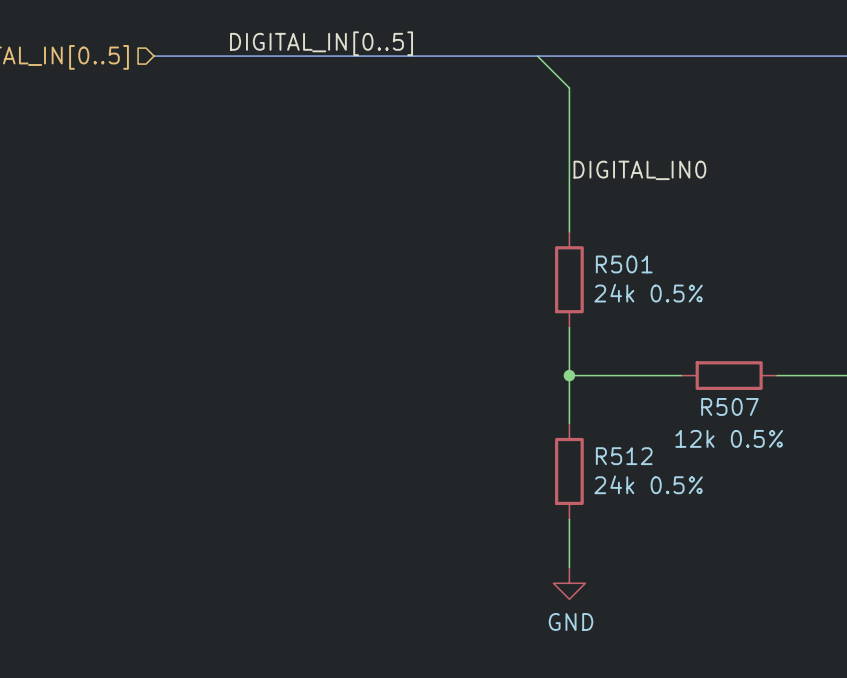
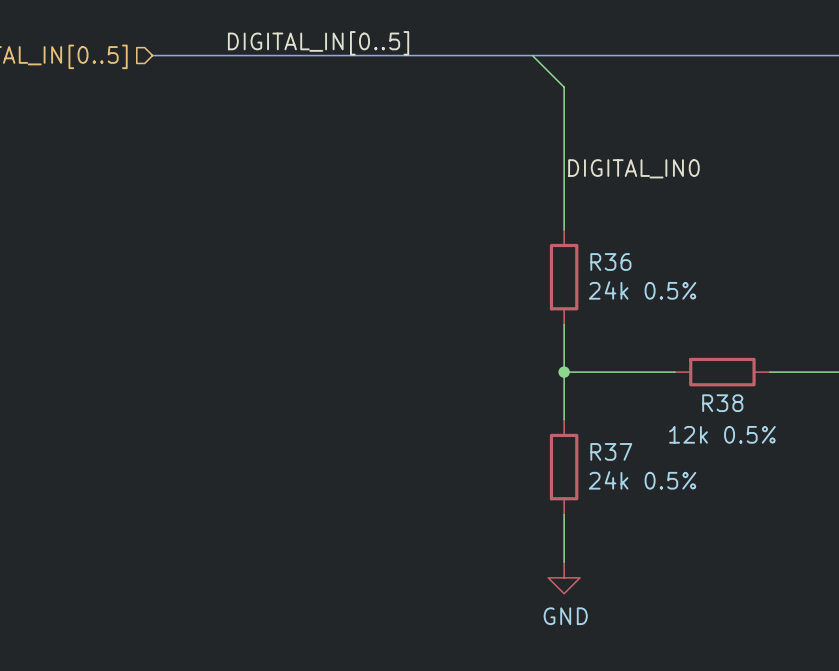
R501 name: R501 (624, 264) -> R36 (610, 261)
R507 name: R507 (729, 406) -> R38 (722, 403)
R512 name: R512 (624, 456) -> R37 (611, 451)

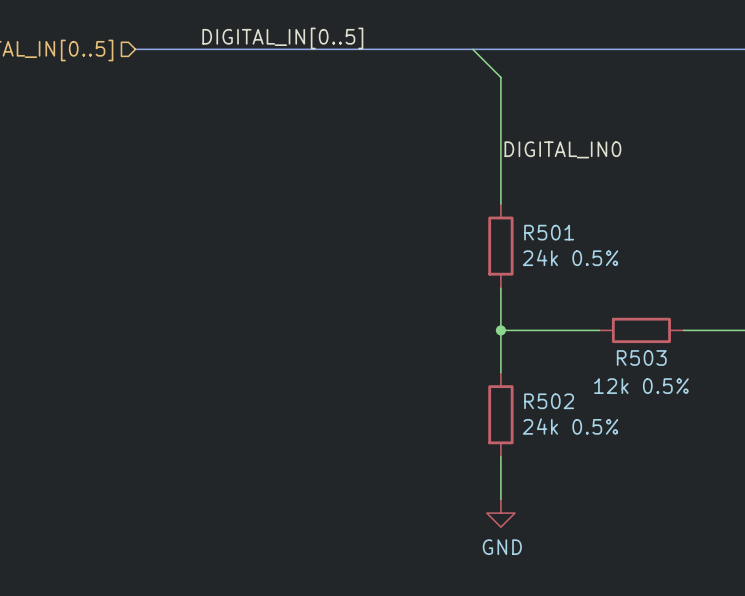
R36 name: R36 (610, 261) -> R501 (549, 232)
R38 name: R38 (722, 403) -> R503 (641, 357)
R37 name: R37 (611, 451) -> R502 (549, 401)

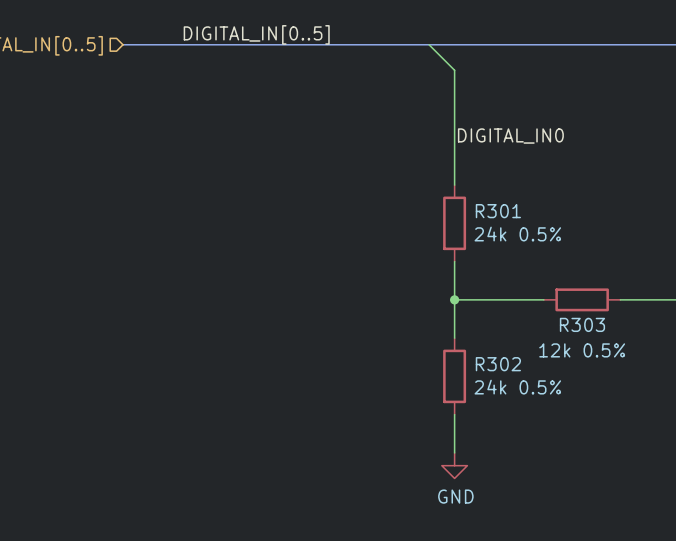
R501 name: R501 (549, 232) -> R301 (498, 211)
R503 name: R503 (641, 357) -> R303 (582, 324)
R502 name: R502 (549, 401) -> R302 (498, 364)

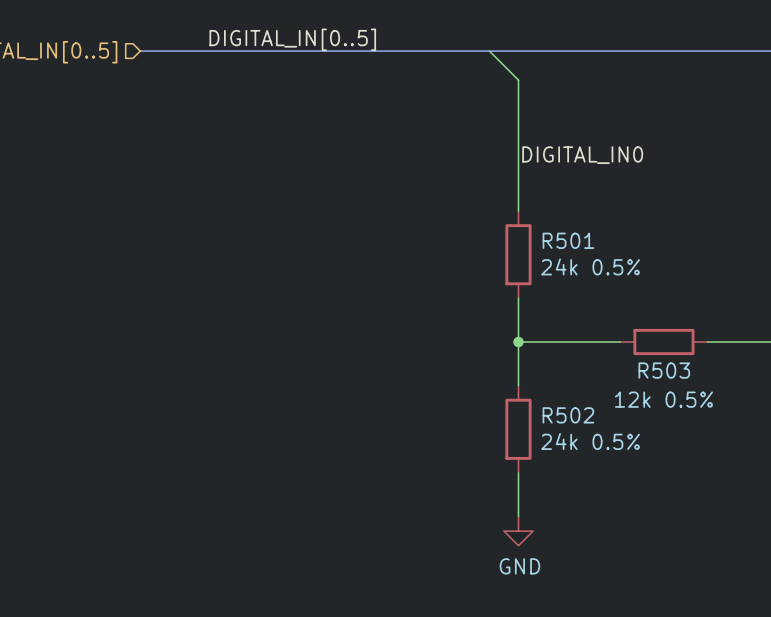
R301 name: R301 (498, 211) -> R501 (568, 240)
R303 name: R303 (582, 324) -> R503 (664, 370)
R302 name: R302 (498, 364) -> R502 (568, 415)

